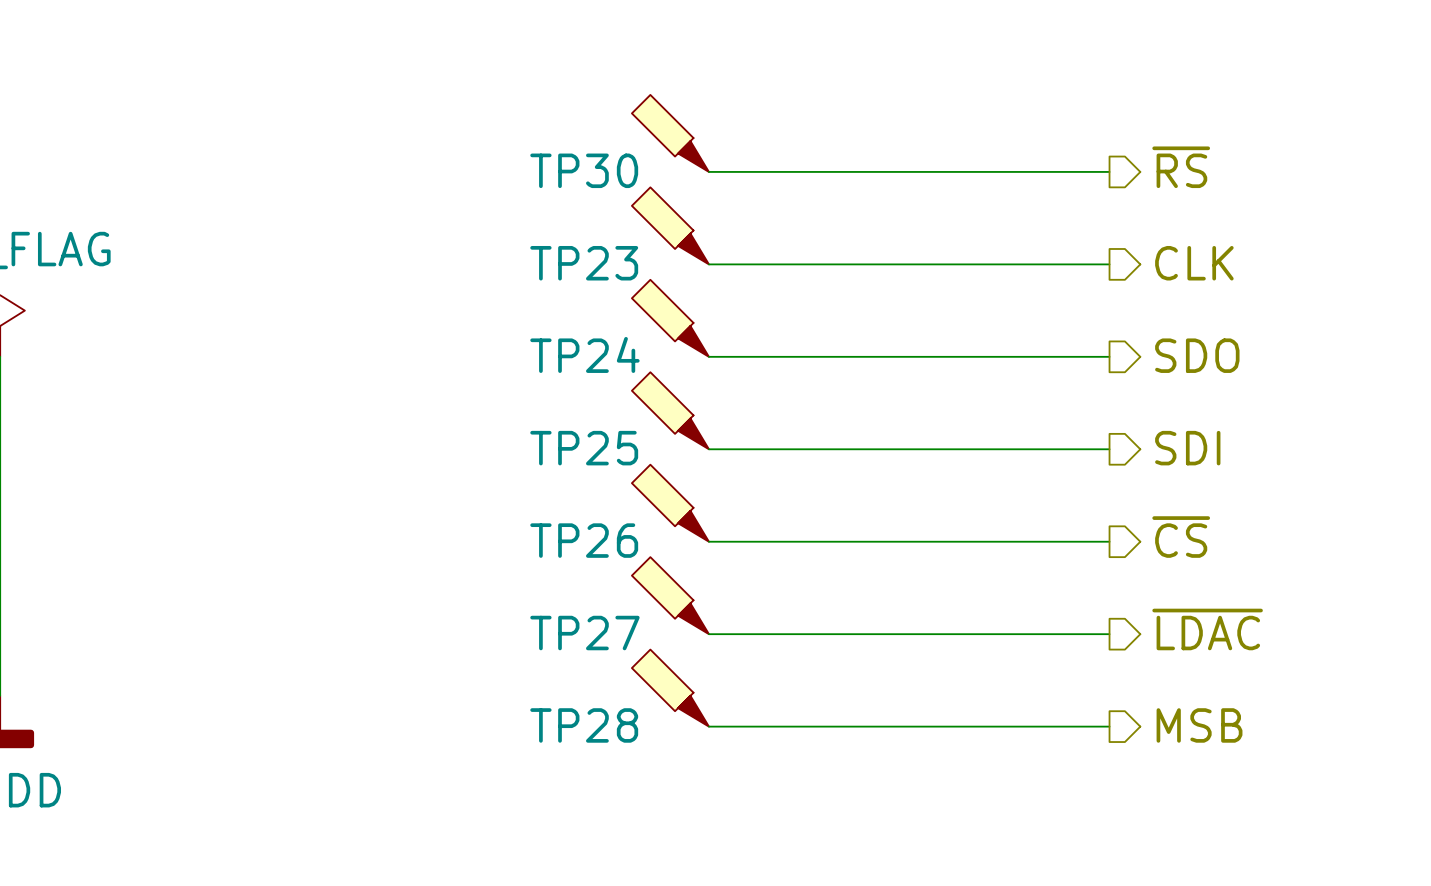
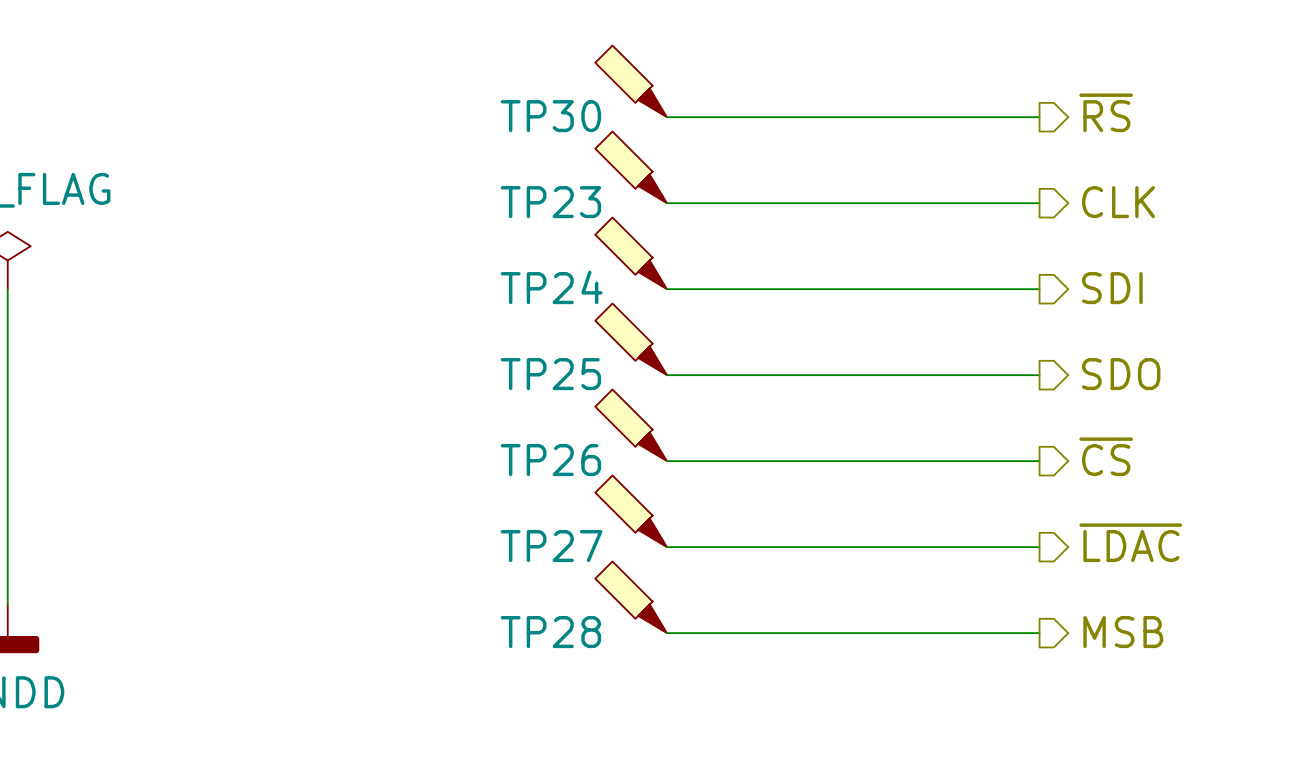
hierarchical label: SDO (1197, 355) -> SDI (1112, 288)
hierarchical label: SDI (1187, 448) -> SDO (1121, 374)

